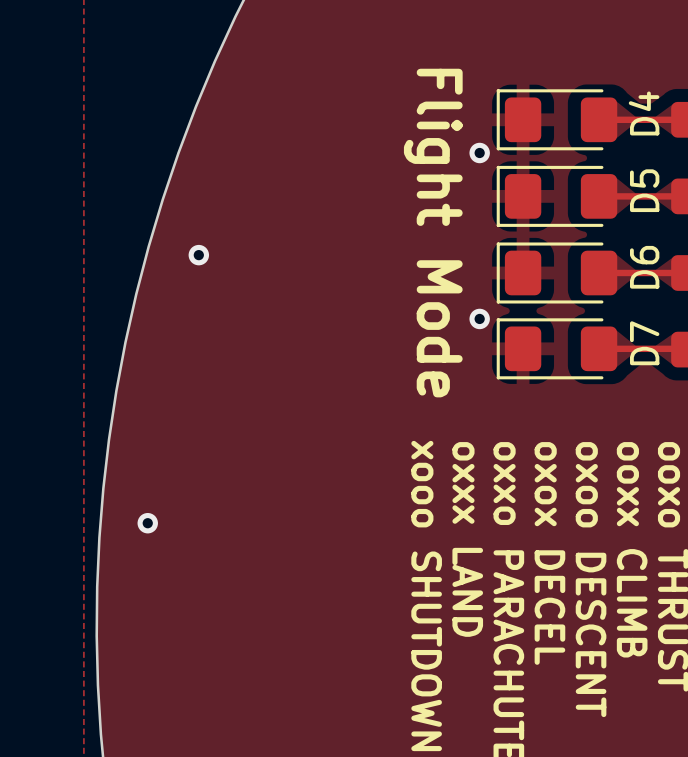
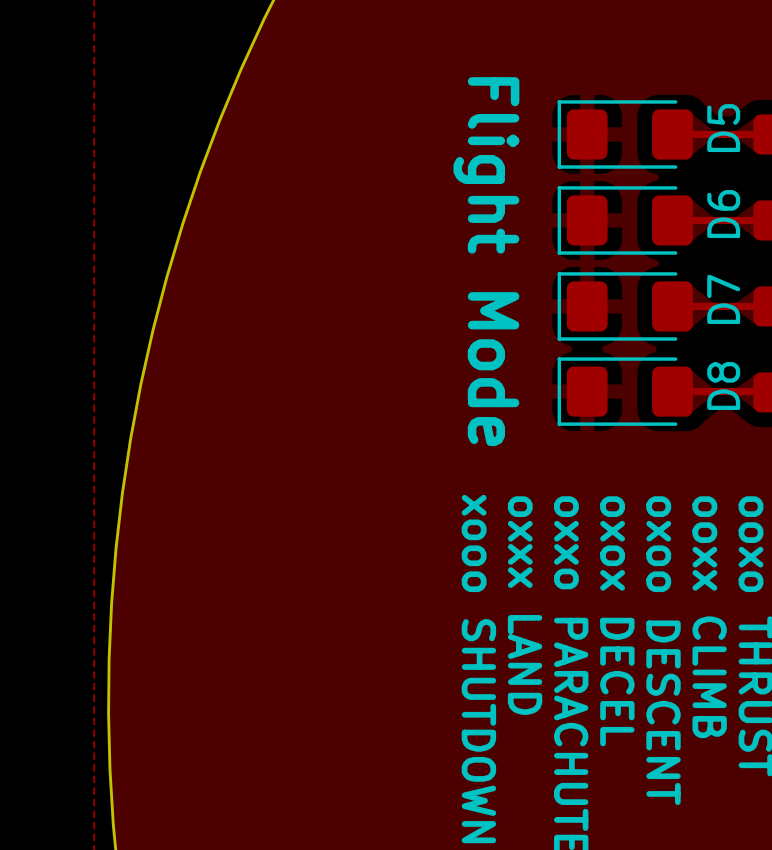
D4 name: D4 (644, 113) -> D5 (723, 128)
via: (479, 152) -> none
D5 name: D5 (644, 190) -> D6 (723, 214)
via: (198, 255) -> none
D6 name: D6 (644, 267) -> D7 (723, 299)
via: (479, 318) -> none
D7 name: D7 (644, 343) -> D8 (723, 386)
via: (147, 523) -> none

